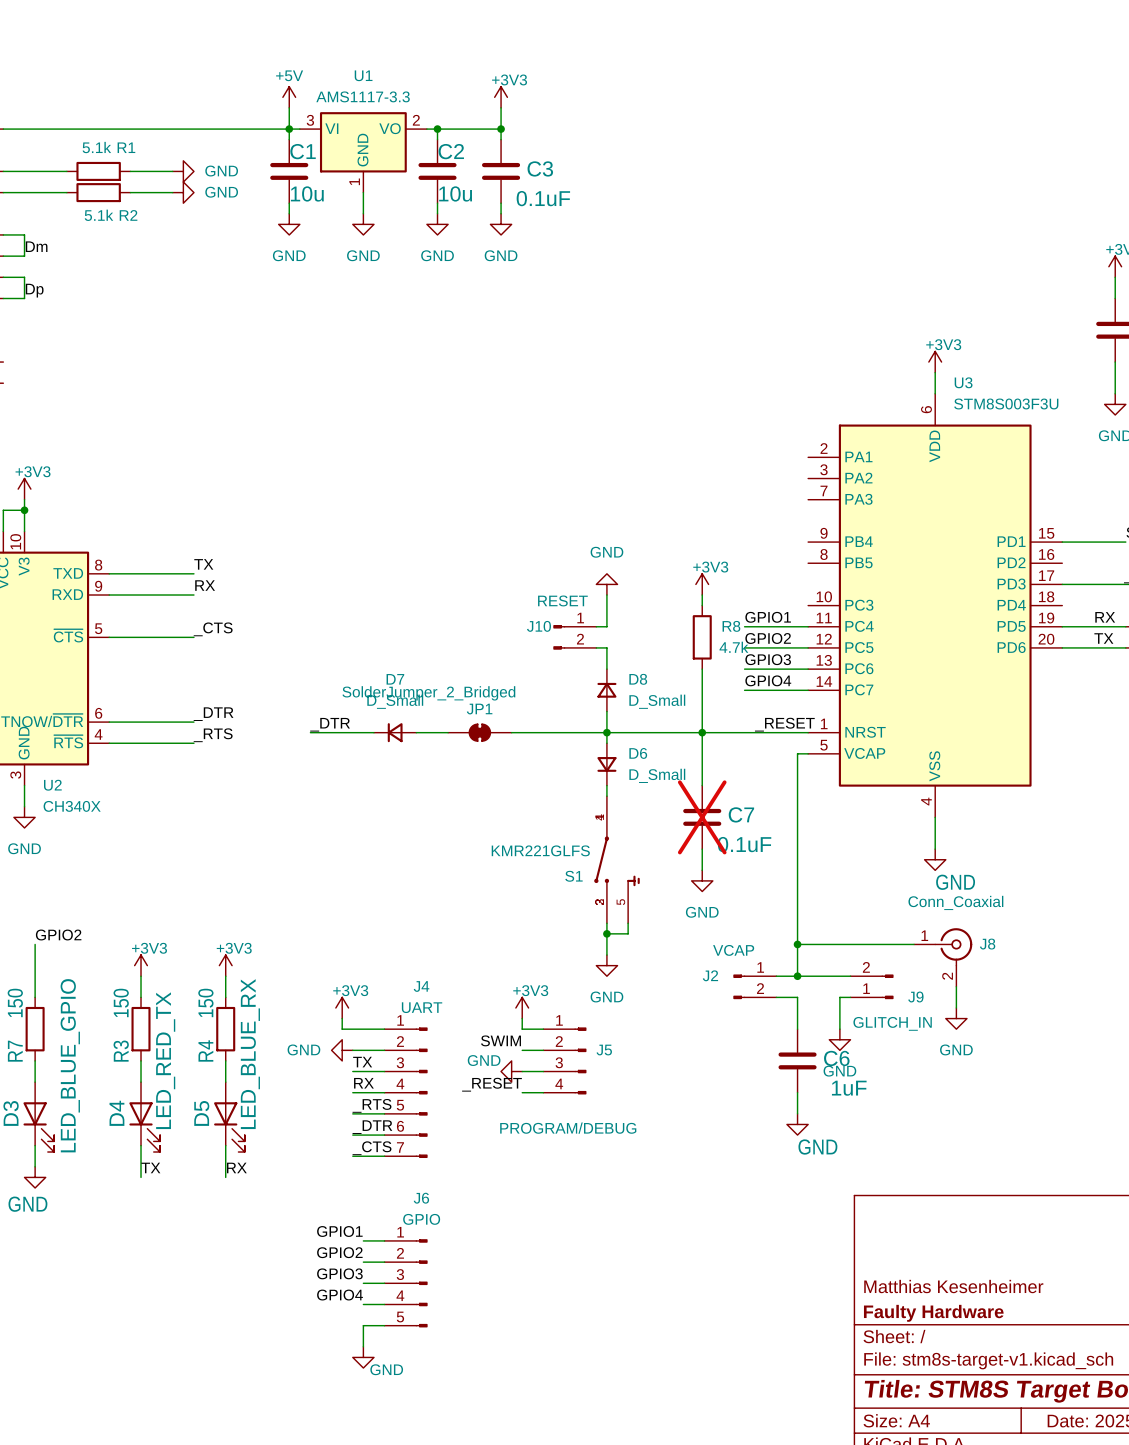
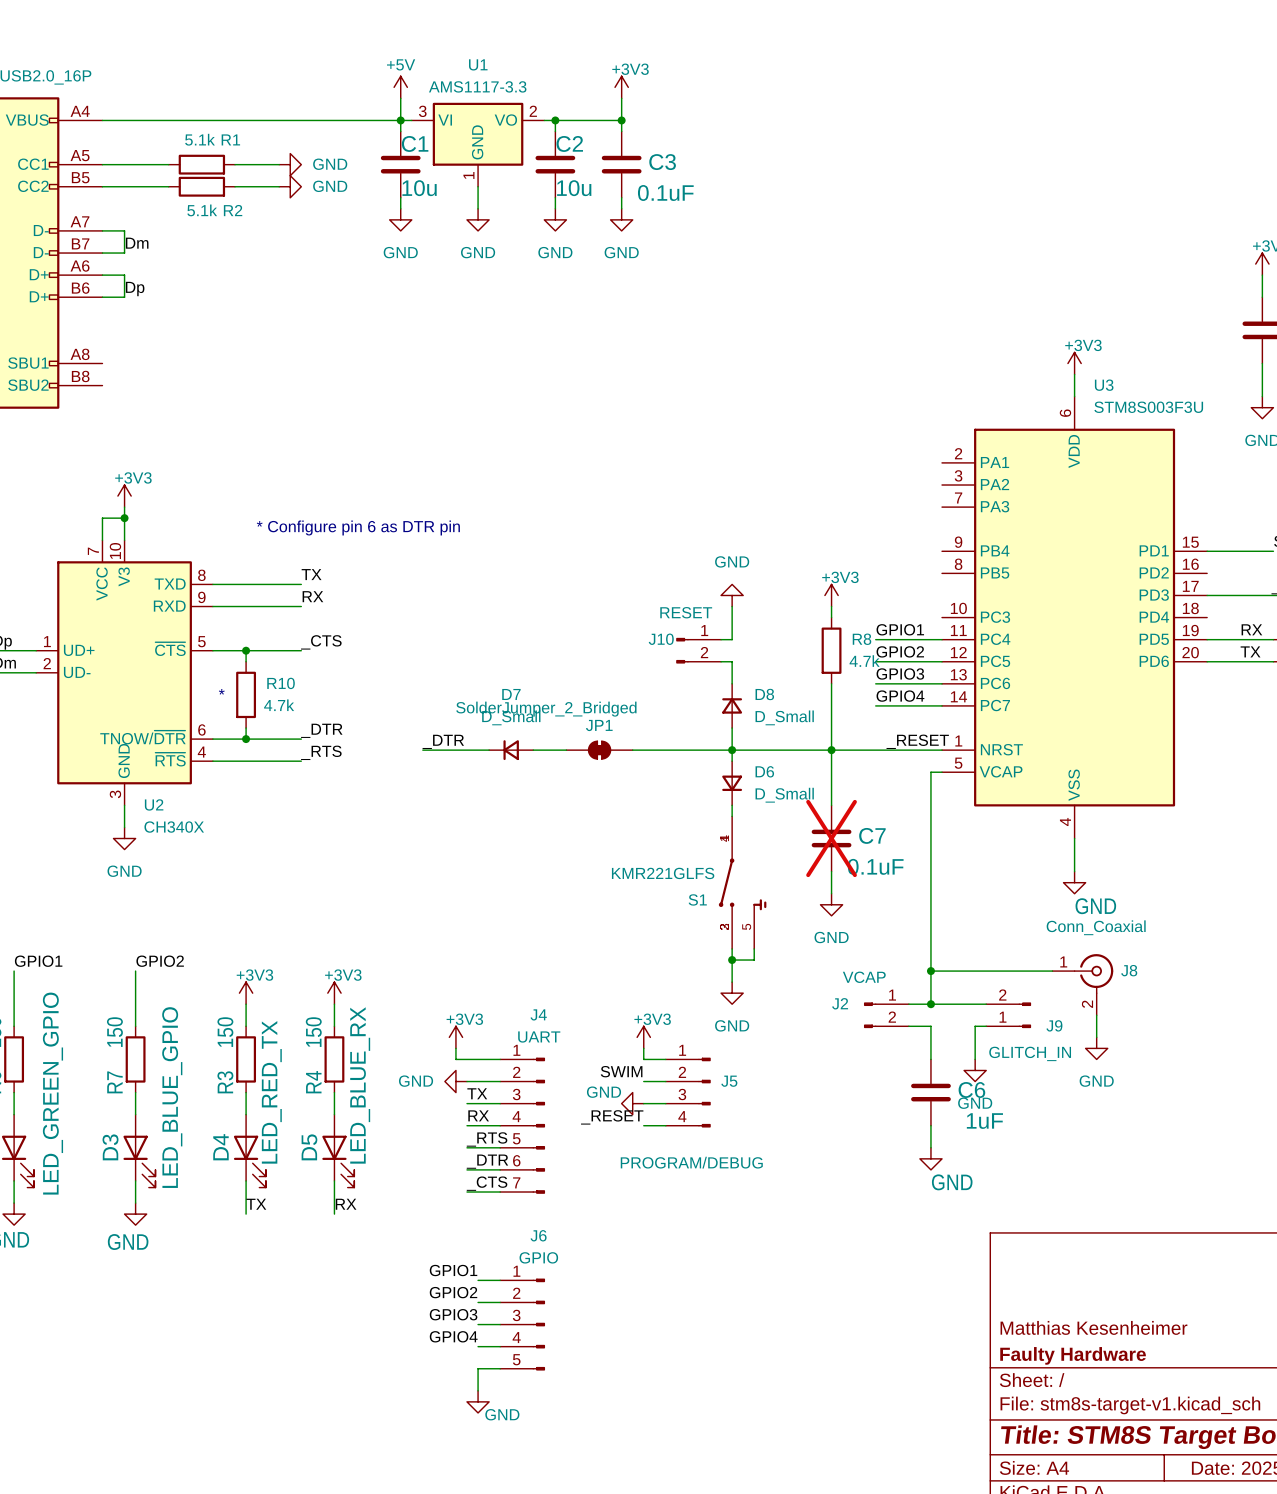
text: none -> * Configure pin 6 as DTR pin (358, 527)
wire: none -> (246, 650) (246, 661)
junction: none -> (246, 650)
text: none -> * (221, 691)
R10: none -> 4.7k (246, 694)
wire: none -> (246, 728) (246, 739)
junction: none -> (246, 739)

